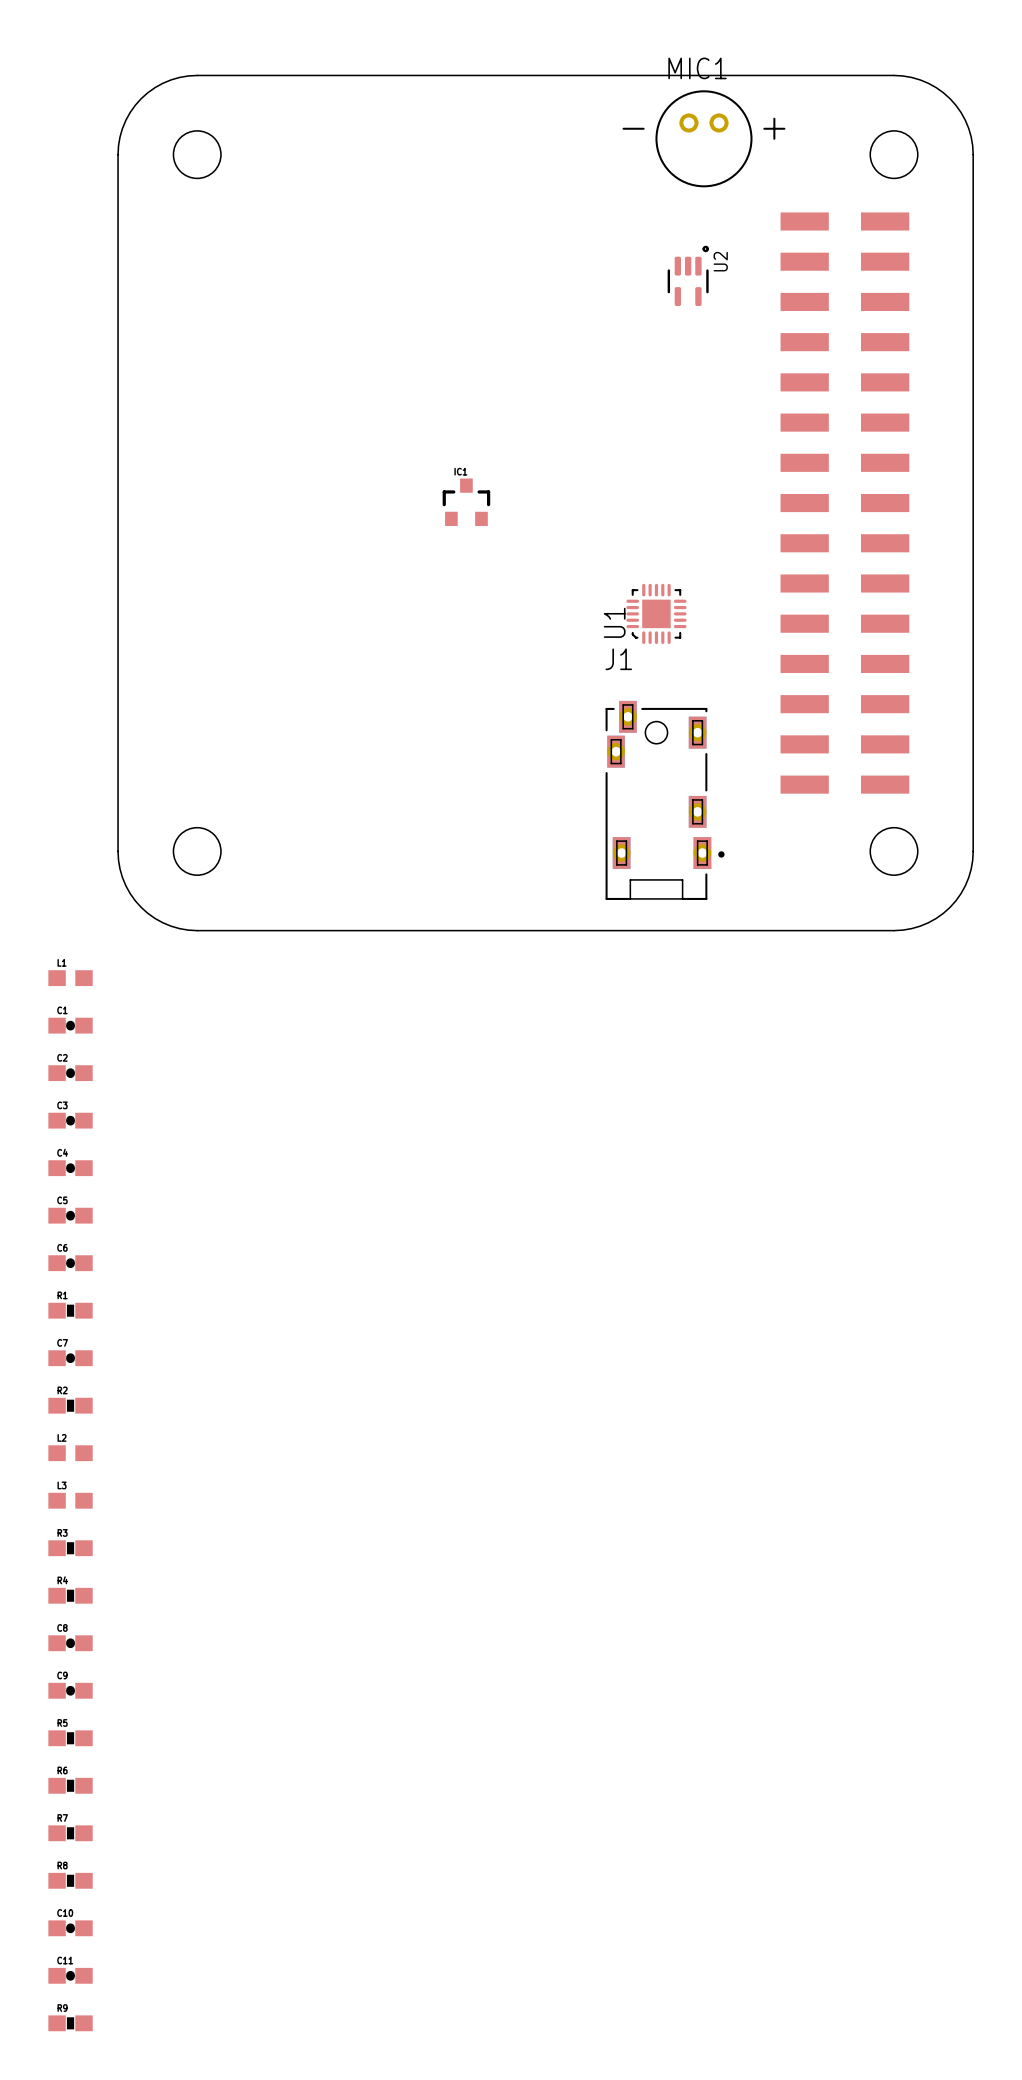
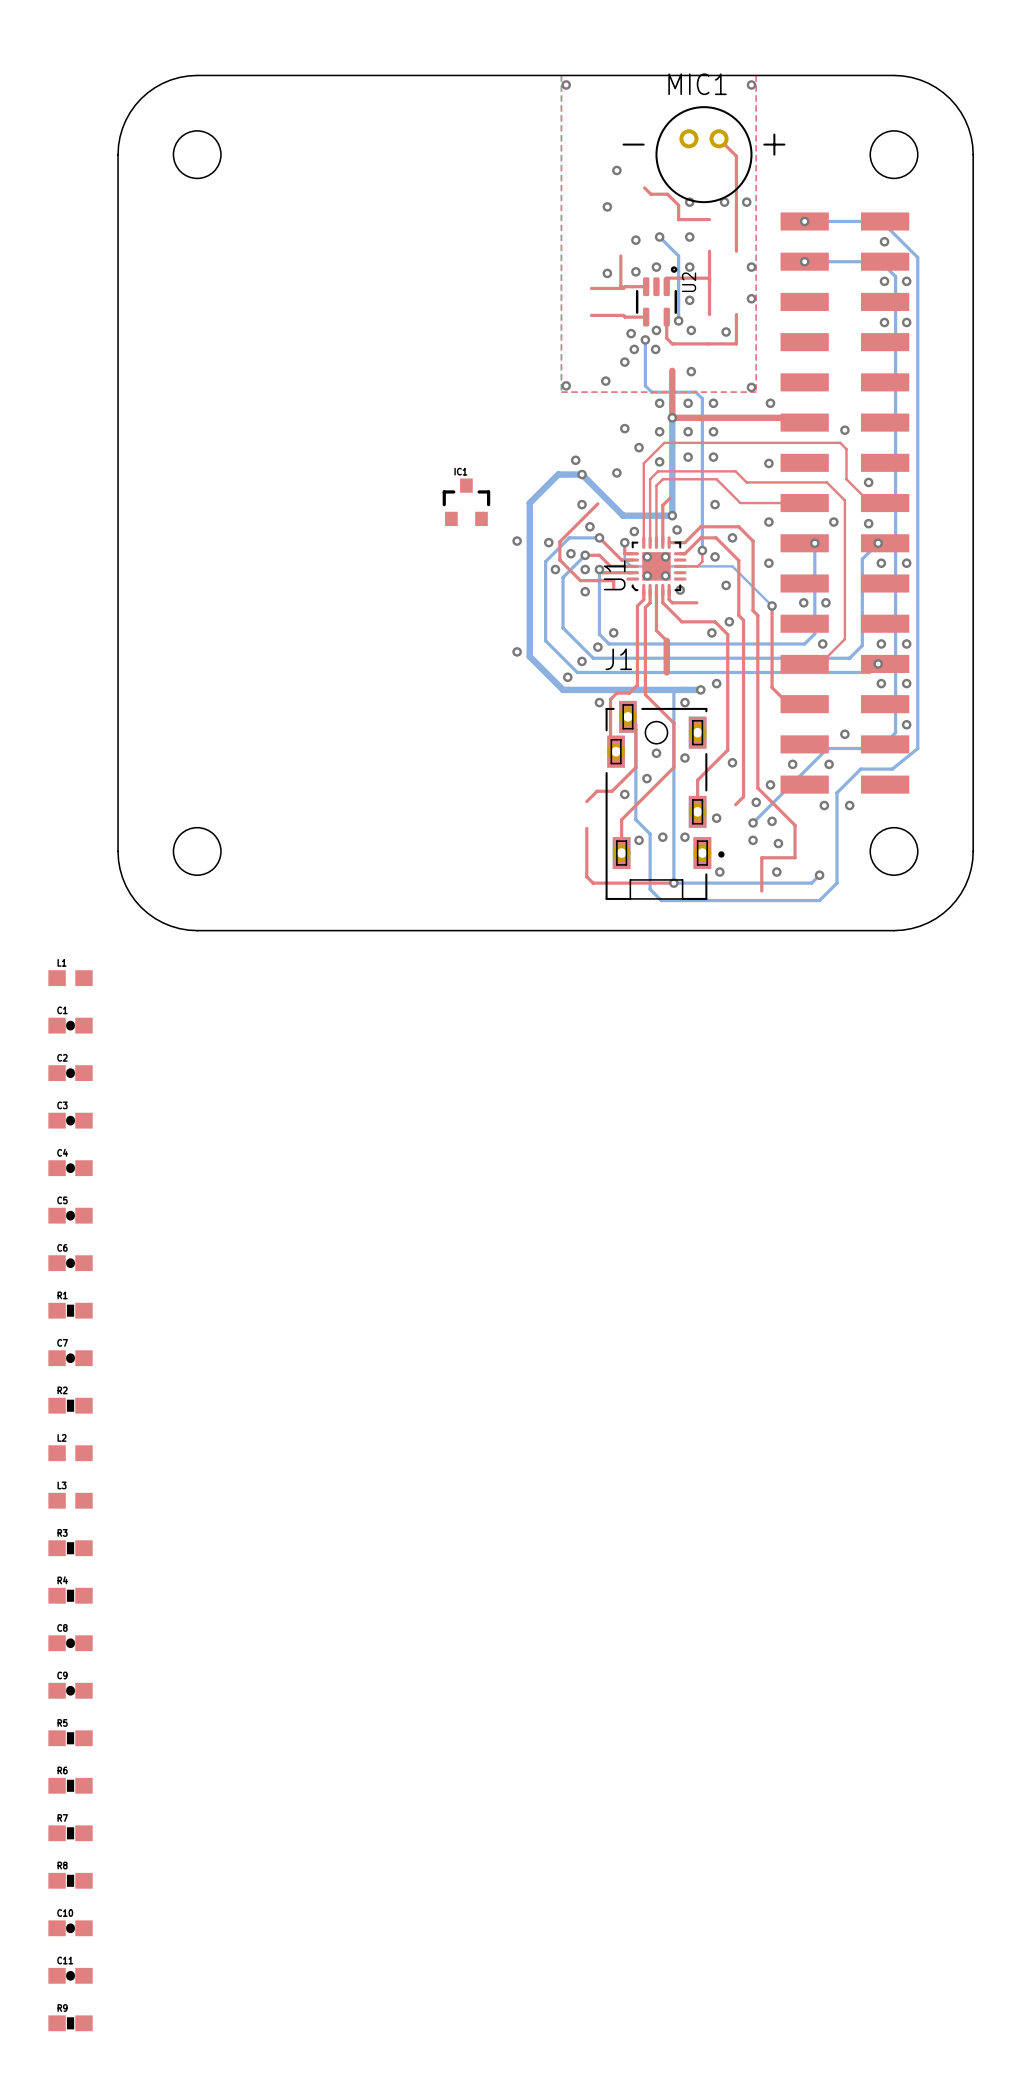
top zone outline: none -> (561, 75) (561, 392) (756, 392) (756, 75)
via: none -> (566, 84)
via: none -> (751, 84)
MIC1 position: (703, 138) -> (703, 154)
top track: none -> (719, 138) (736, 156) (736, 251)
via: none -> (616, 170)
top track: none -> (644, 187) (650, 194) (667, 194) (678, 205) (678, 219) (709, 219)
via: none -> (689, 202)
via: none -> (724, 202)
via: none -> (746, 202)
via: none -> (607, 206)
bottom track: none -> (804, 221) (881, 221) (917, 257) (917, 748) (892, 769) (860, 769) (837, 792) (837, 883) (819, 900) (661, 900) (650, 889) (650, 834) (635, 819) (635, 724) (627, 716)
via: none -> (804, 221)
bottom track: none -> (659, 237) (678, 256) (678, 320)
via: none -> (659, 237)
via: none -> (689, 237)
via: none -> (635, 240)
via: none -> (884, 241)
top track: none -> (709, 251) (709, 314)
top track: none -> (620, 256) (620, 286) (623, 288)
bottom track: none -> (804, 261) (880, 261) (895, 276) (895, 732) (879, 748) (827, 748) (753, 822)
via: none -> (804, 261)
via: none -> (656, 267)
via: none -> (689, 267)
via: none -> (751, 267)
via: none -> (635, 271)
via: none -> (607, 273)
U2 position: (688, 275) -> (656, 296)
top track: none -> (709, 278) (666, 278) (666, 286)
via: none -> (884, 281)
via: none -> (906, 281)
top track: none -> (646, 286) (624, 286) (623, 288)
top track: none -> (591, 288) (623, 288)
via: none -> (751, 298)
via: none -> (689, 300)
top track: none -> (736, 314) (736, 343) (672, 343) (666, 338) (666, 317)
top track: none -> (591, 315) (646, 317)
via: none -> (678, 320)
via: none -> (884, 322)
via: none -> (906, 322)
via: none -> (656, 330)
via: none -> (691, 330)
via: none -> (726, 332)
via: none -> (631, 333)
bottom track: none -> (645, 339) (645, 385) (651, 392) (695, 392) (702, 398) (702, 550)
via: none -> (645, 339)
via: none -> (634, 349)
via: none -> (655, 349)
via: none -> (624, 362)
top track: none -> (672, 370) (672, 417) (804, 417) (804, 422)
via: none -> (691, 371)
via: none -> (605, 381)
via: none -> (566, 385)
via: none -> (751, 387)
via: none -> (659, 403)
via: none -> (688, 403)
via: none -> (713, 403)
via: none -> (770, 403)
bottom track: none -> (672, 417) (672, 515) (623, 515) (582, 474) (558, 474) (529, 503) (529, 656) (563, 689) (700, 689)
via: none -> (672, 417)
via: none -> (624, 428)
via: none -> (844, 430)
via: none -> (659, 431)
via: none -> (688, 431)
via: none -> (713, 431)
via: none -> (639, 447)
via: none -> (688, 457)
via: none -> (713, 457)
via: none -> (575, 460)
via: none -> (659, 461)
via: none -> (768, 463)
via: none -> (616, 472)
via: none -> (582, 474)
via: none -> (868, 482)
top track: none -> (669, 498) (662, 505) (662, 542)
top track: none -> (597, 503) (559, 541) (559, 560) (580, 580) (613, 580) (613, 587)
top track: none -> (804, 503) (740, 503) (716, 479) (662, 479) (656, 485) (656, 542)
top track: none -> (885, 503) (870, 503) (846, 479) (846, 449) (840, 442) (664, 442) (643, 463) (643, 542)
via: none -> (582, 504)
via: none -> (715, 504)
via: none -> (672, 515)
via: none -> (768, 522)
via: none -> (833, 522)
via: none -> (868, 523)
via: none -> (589, 526)
via: none -> (677, 529)
via: none -> (634, 531)
top track: none -> (599, 537) (621, 560) (632, 560)
bottom track: none -> (599, 537) (569, 537) (545, 561) (545, 640) (577, 672) (869, 672) (878, 663)
via: none -> (599, 537)
via: none -> (732, 537)
via: none -> (517, 541)
via: none -> (548, 542)
top track: none -> (624, 542) (624, 553) (632, 553)
bottom track: none -> (624, 542) (624, 560) (631, 566) (732, 566) (772, 605)
via: none -> (624, 542)
top track: none -> (650, 542) (650, 479) (658, 471) (735, 471) (746, 482) (826, 482) (844, 500) (844, 639) (820, 663) (804, 663)
top track: none -> (669, 542) (684, 542) (700, 526) (738, 526) (753, 541) (753, 610) (757, 615) (757, 788) (795, 825) (795, 857) (761, 857) (761, 891)
bottom track: none -> (814, 543) (814, 633) (804, 643) (609, 643) (599, 634) (599, 569)
via: none -> (814, 543)
bottom track: none -> (878, 543) (862, 559) (862, 645) (849, 658) (593, 658) (563, 627) (563, 577) (585, 555)
via: none -> (878, 543)
top track: none -> (702, 550) (702, 561) (697, 566) (680, 566)
via: none -> (702, 550)
via: none -> (570, 553)
top track: none -> (680, 553) (684, 553) (700, 537) (716, 537) (738, 560) (738, 615) (743, 620) (743, 796) (735, 804)
top track: none -> (585, 555) (599, 555) (610, 566) (632, 566)
via: none -> (585, 555)
via: none -> (647, 556)
via: none -> (665, 556)
via: none -> (715, 556)
via: none -> (768, 563)
via: none -> (881, 563)
via: none -> (906, 563)
via: none -> (555, 569)
via: none -> (585, 569)
top track: none -> (599, 569) (602, 572) (632, 572)
via: none -> (599, 569)
via: none -> (647, 575)
via: none -> (665, 575)
via: none -> (726, 585)
top track: none -> (643, 590) (643, 599) (637, 605) (637, 685) (629, 693) (616, 693) (610, 699) (610, 746) (616, 751)
top track: none -> (650, 590) (650, 602) (645, 607) (645, 694) (673, 723) (673, 767) (621, 819) (621, 853)
top track: none -> (656, 590) (656, 630) (666, 640) (666, 672)
top track: none -> (662, 590) (662, 602) (681, 621) (715, 621) (727, 634) (727, 750) (697, 780) (697, 811)
top track: none -> (669, 590) (669, 599) (672, 602) (696, 602)
via: none -> (680, 590)
via: none -> (585, 591)
via: none -> (803, 602)
via: none -> (825, 602)
top track: none -> (772, 605) (772, 687) (788, 704) (804, 704)
via: none -> (772, 605)
U1 position: (656, 613) -> (656, 566)
via: none -> (729, 621)
via: none -> (613, 632)
via: none -> (711, 632)
via: none -> (822, 643)
via: none -> (881, 643)
via: none -> (906, 643)
via: none -> (597, 647)
via: none -> (517, 651)
via: none -> (582, 661)
via: none -> (878, 663)
via: none -> (567, 677)
via: none -> (716, 683)
via: none -> (881, 683)
via: none -> (906, 683)
bottom track: none -> (683, 689) (673, 689) (673, 883) (811, 883) (819, 875)
via: none -> (700, 689)
via: none -> (599, 702)
via: none -> (684, 702)
top track: none -> (627, 716) (627, 721) (635, 729) (635, 767) (612, 791) (597, 791) (586, 801)
via: none -> (906, 724)
via: none -> (844, 734)
via: none -> (656, 753)
via: none -> (684, 758)
via: none -> (732, 762)
via: none -> (792, 764)
via: none -> (829, 764)
via: none -> (646, 778)
via: none -> (770, 784)
via: none -> (624, 794)
via: none -> (756, 802)
via: none -> (824, 805)
via: none -> (849, 805)
via: none -> (716, 818)
via: none -> (772, 821)
via: none -> (753, 822)
top track: none -> (586, 828) (586, 876) (593, 883) (673, 883)
via: none -> (662, 837)
via: none -> (684, 837)
via: none -> (639, 840)
via: none -> (753, 840)
via: none -> (778, 843)
via: none -> (719, 872)
via: none -> (776, 872)
via: none -> (819, 875)
via: none -> (673, 883)

